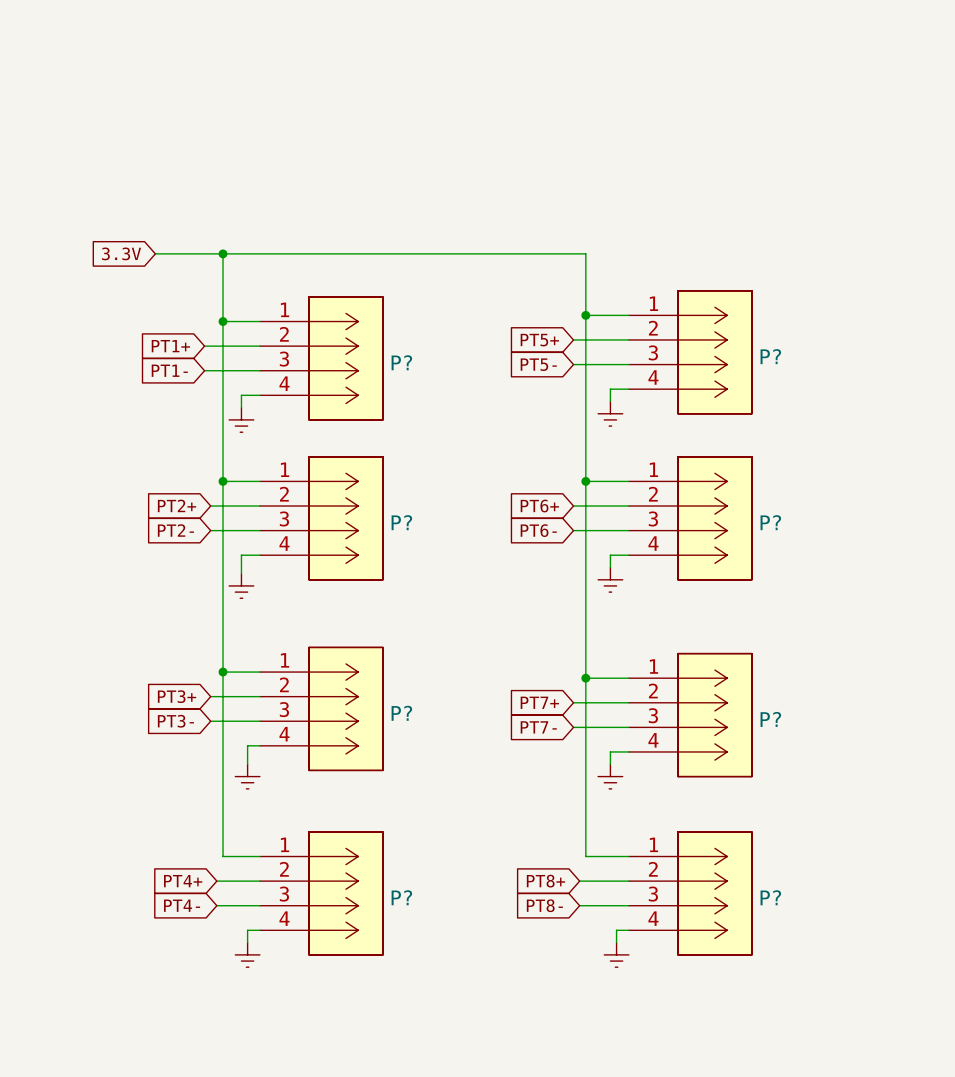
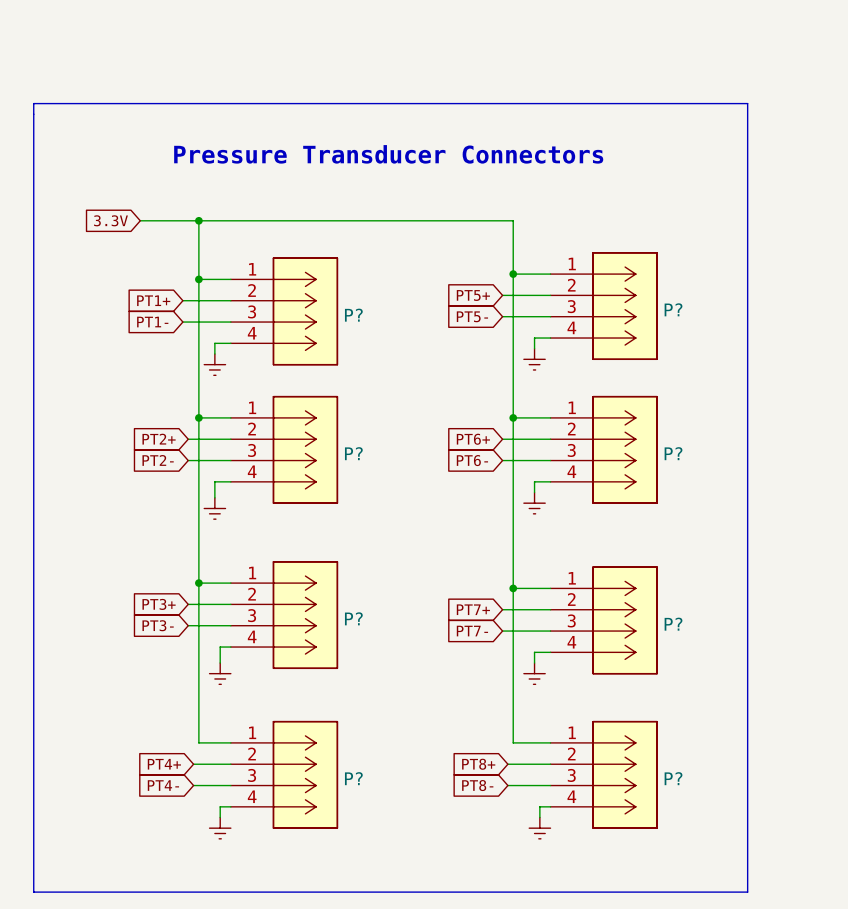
line: none -> (33, 103) (747, 103) (747, 892) (33, 892) (33, 103)
text: none -> Pressure Transducer Connectors (388, 154)

